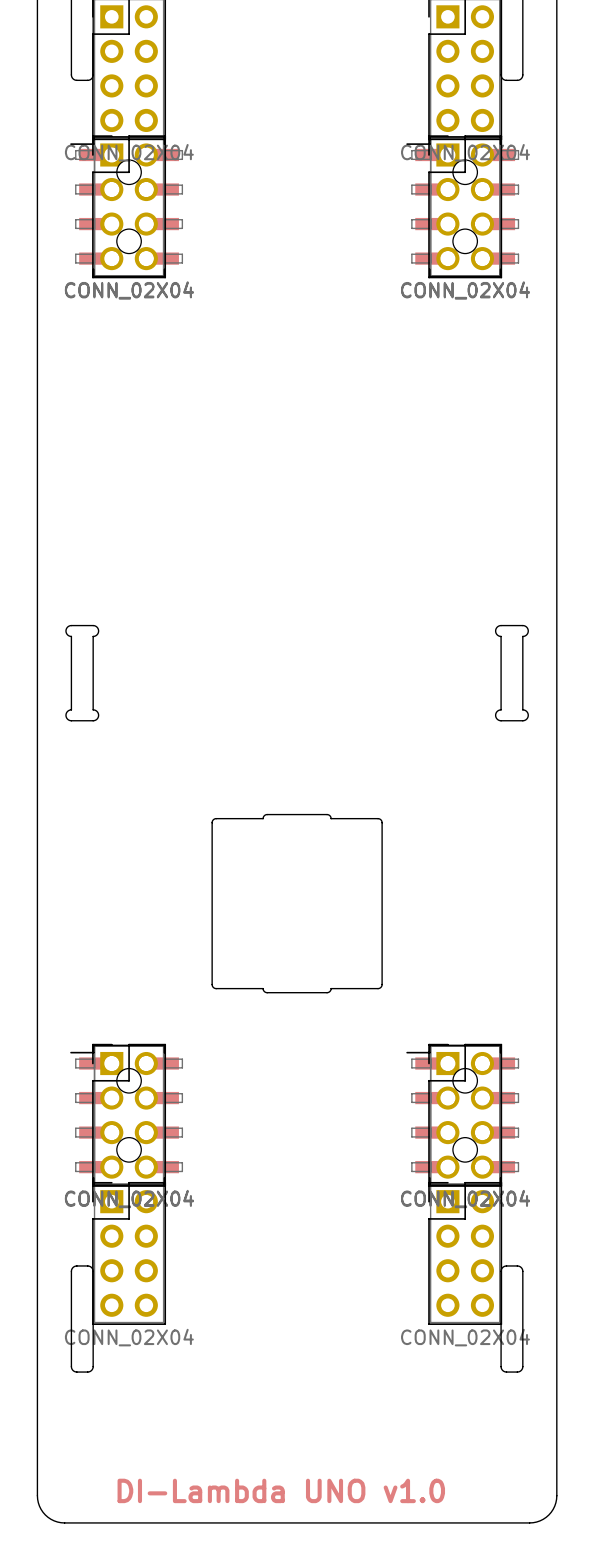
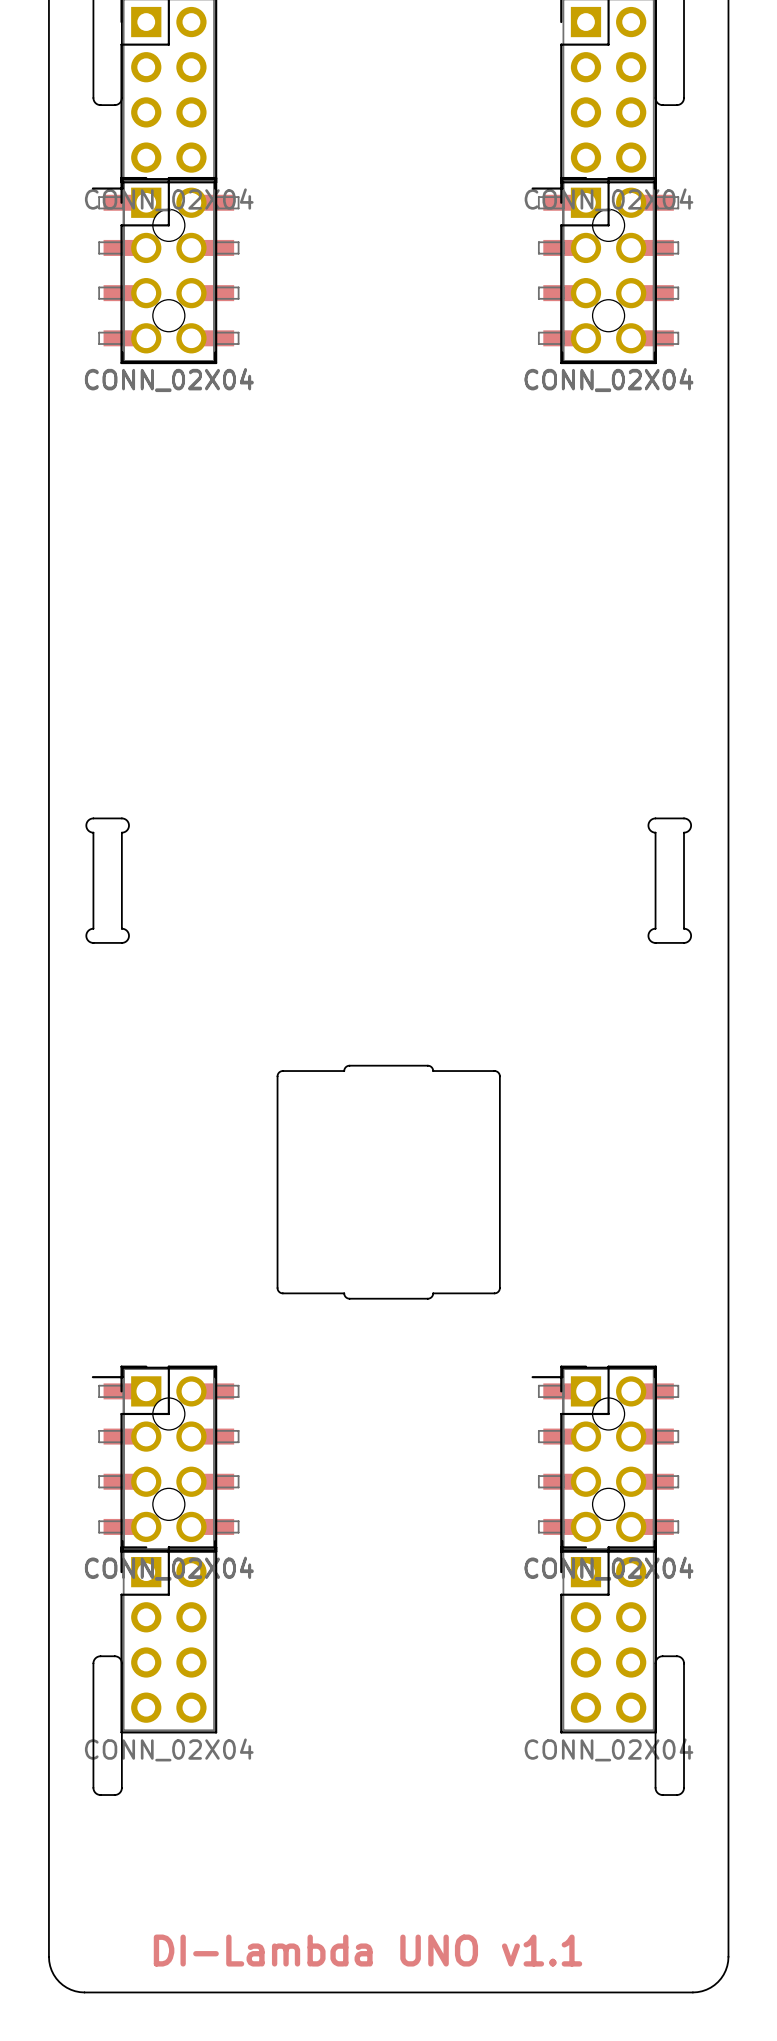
text: DI-Lambda UNO v1.0 (281, 1490) -> DI-Lambda UNO v1.1 (368, 1950)

